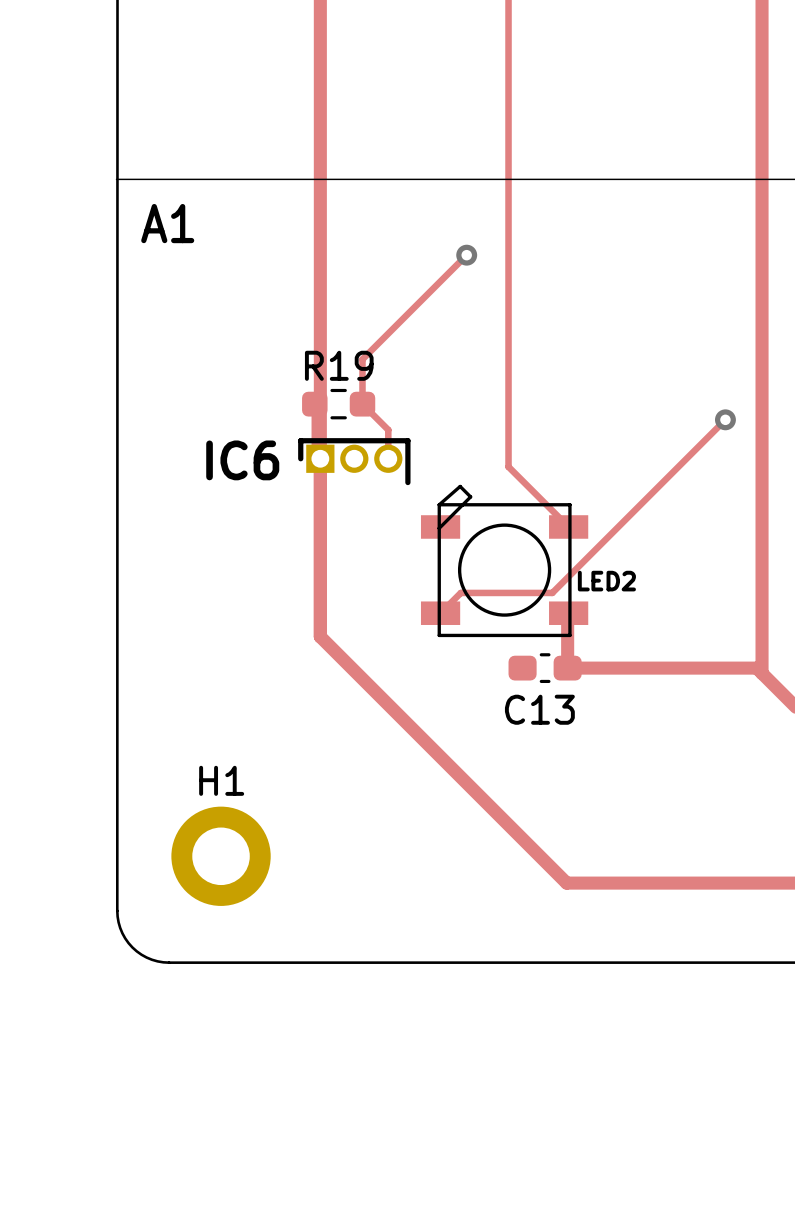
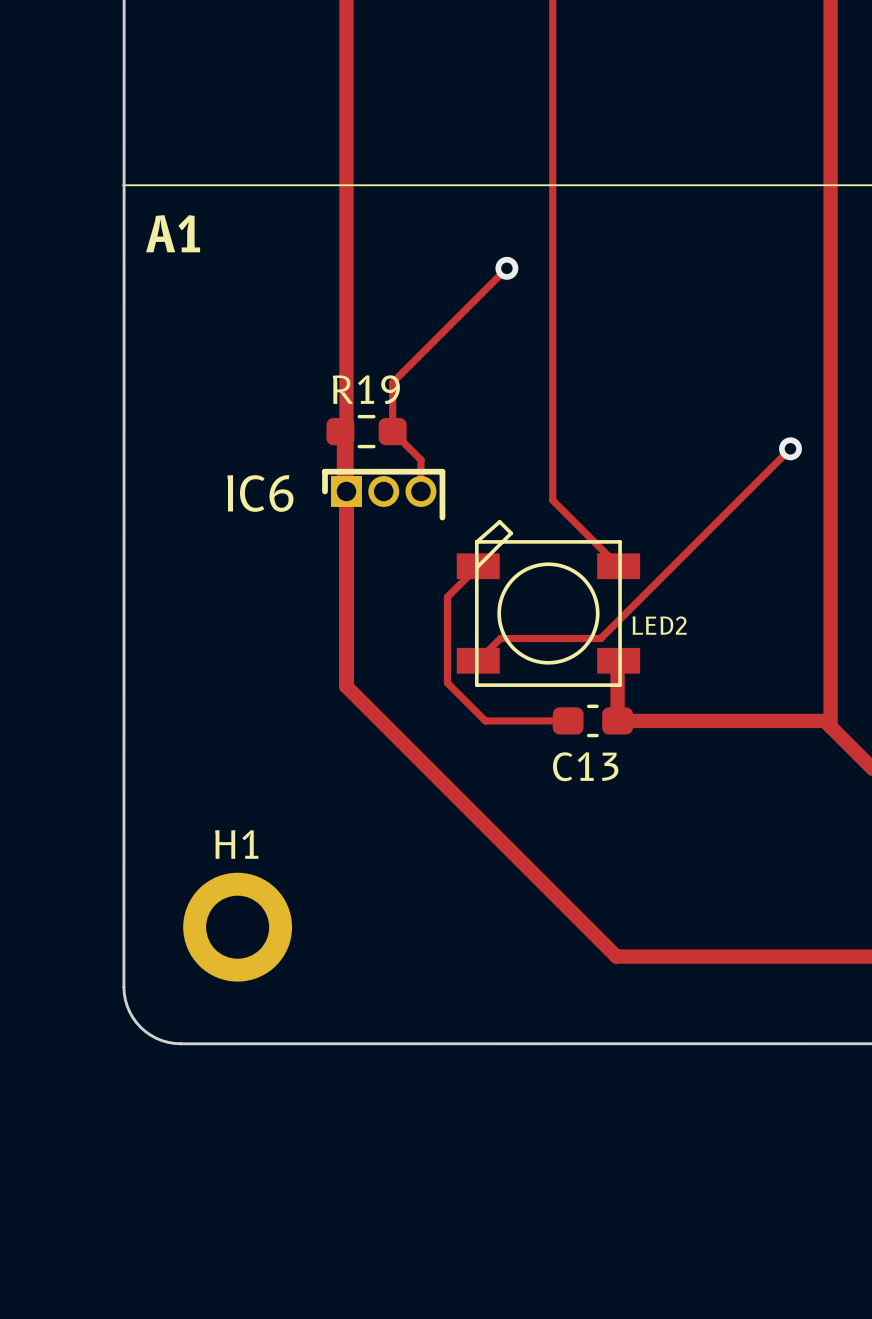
track: none -> (478, 566) (447, 597) (447, 683) (485, 720) (568, 720)

